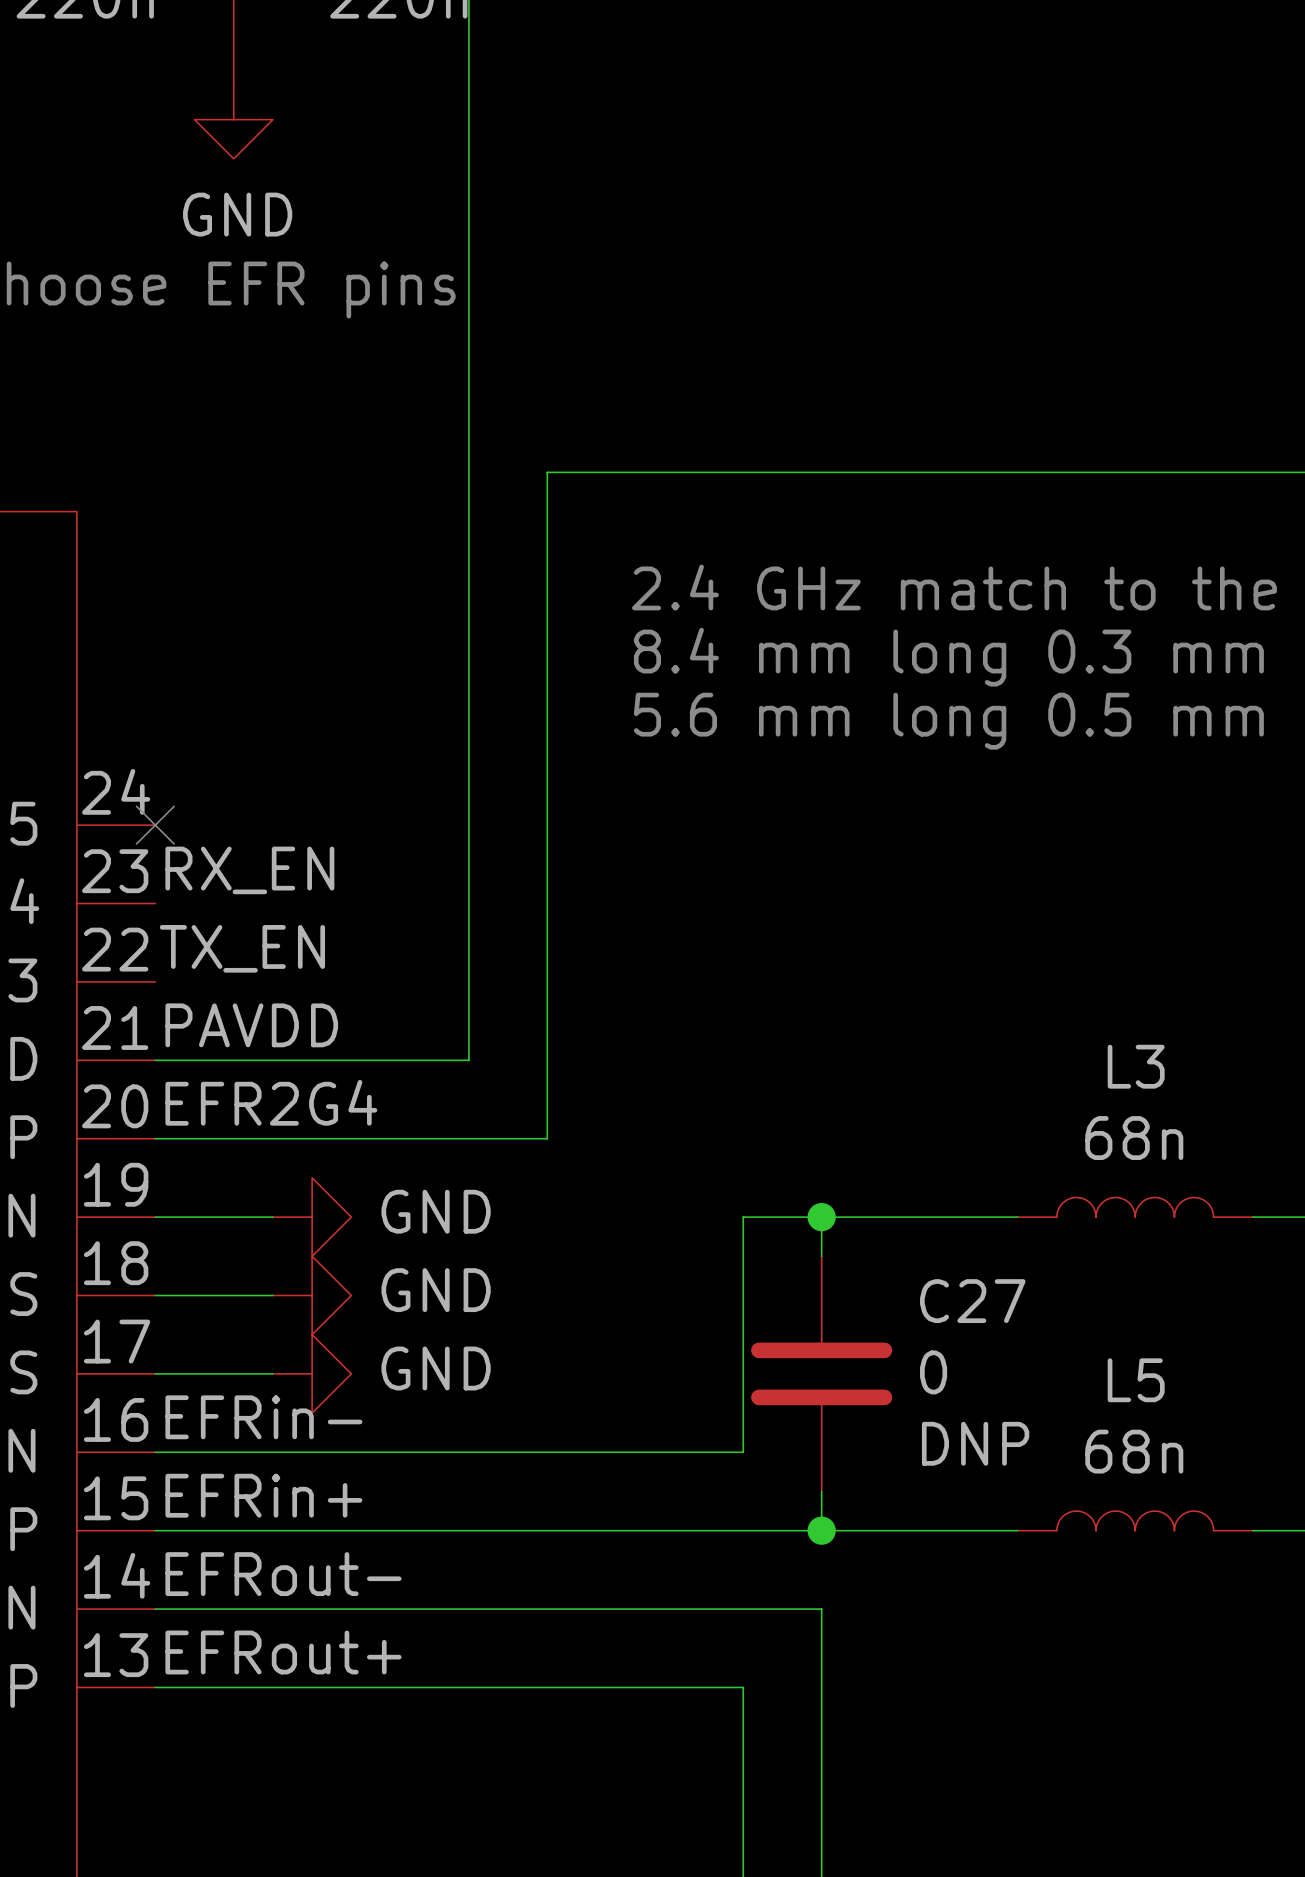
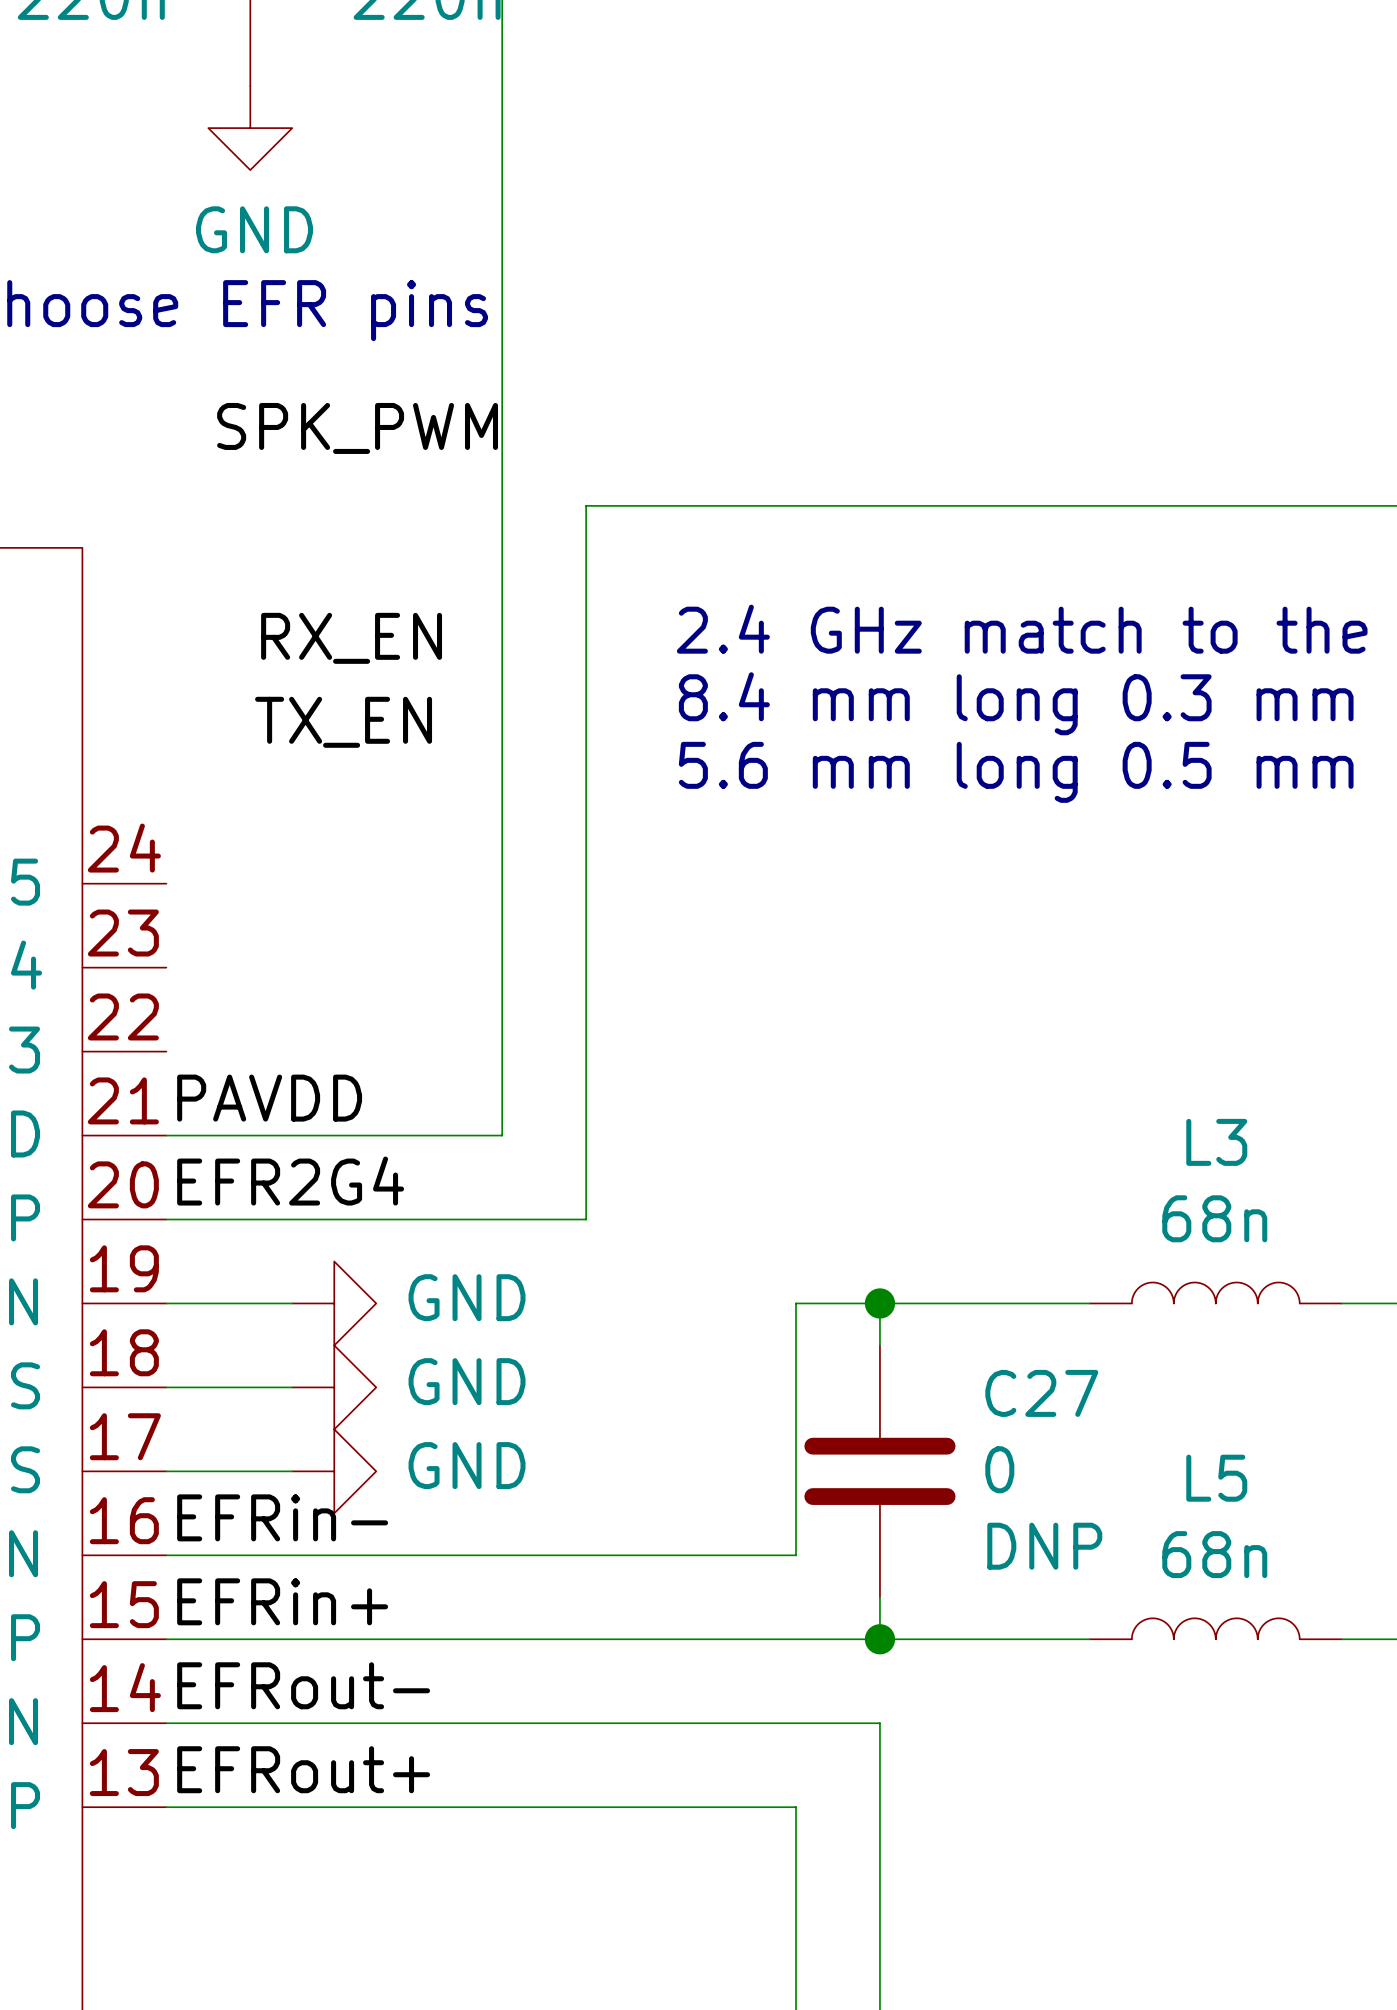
label: none -> SPK_PWM (357, 428)
no-connect mark: (155, 825) -> none
label position: RX_EN (249, 870) -> RX_EN (351, 638)
label position: TX_EN (242, 948) -> TX_EN (343, 722)

